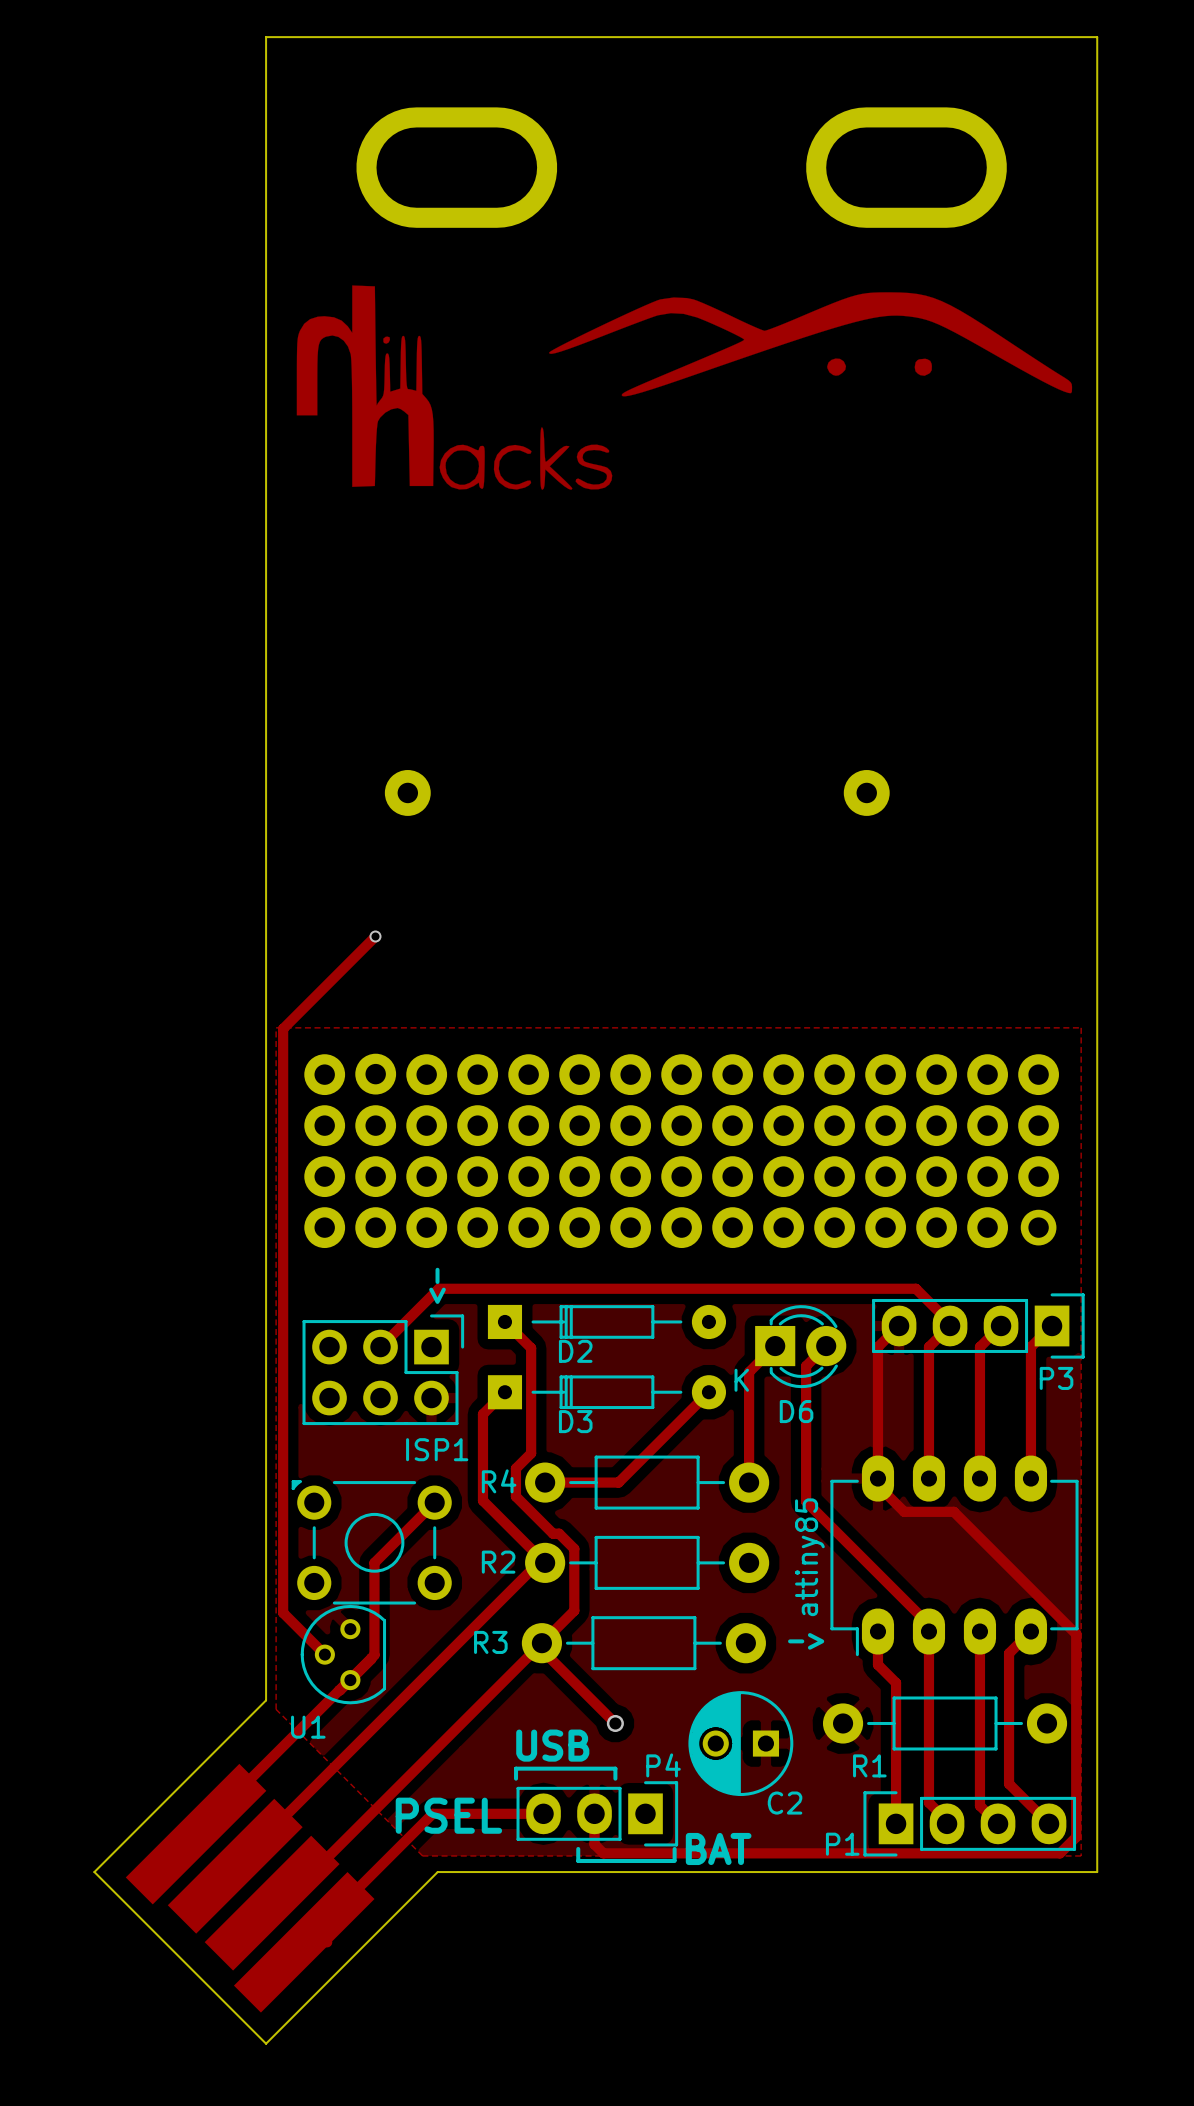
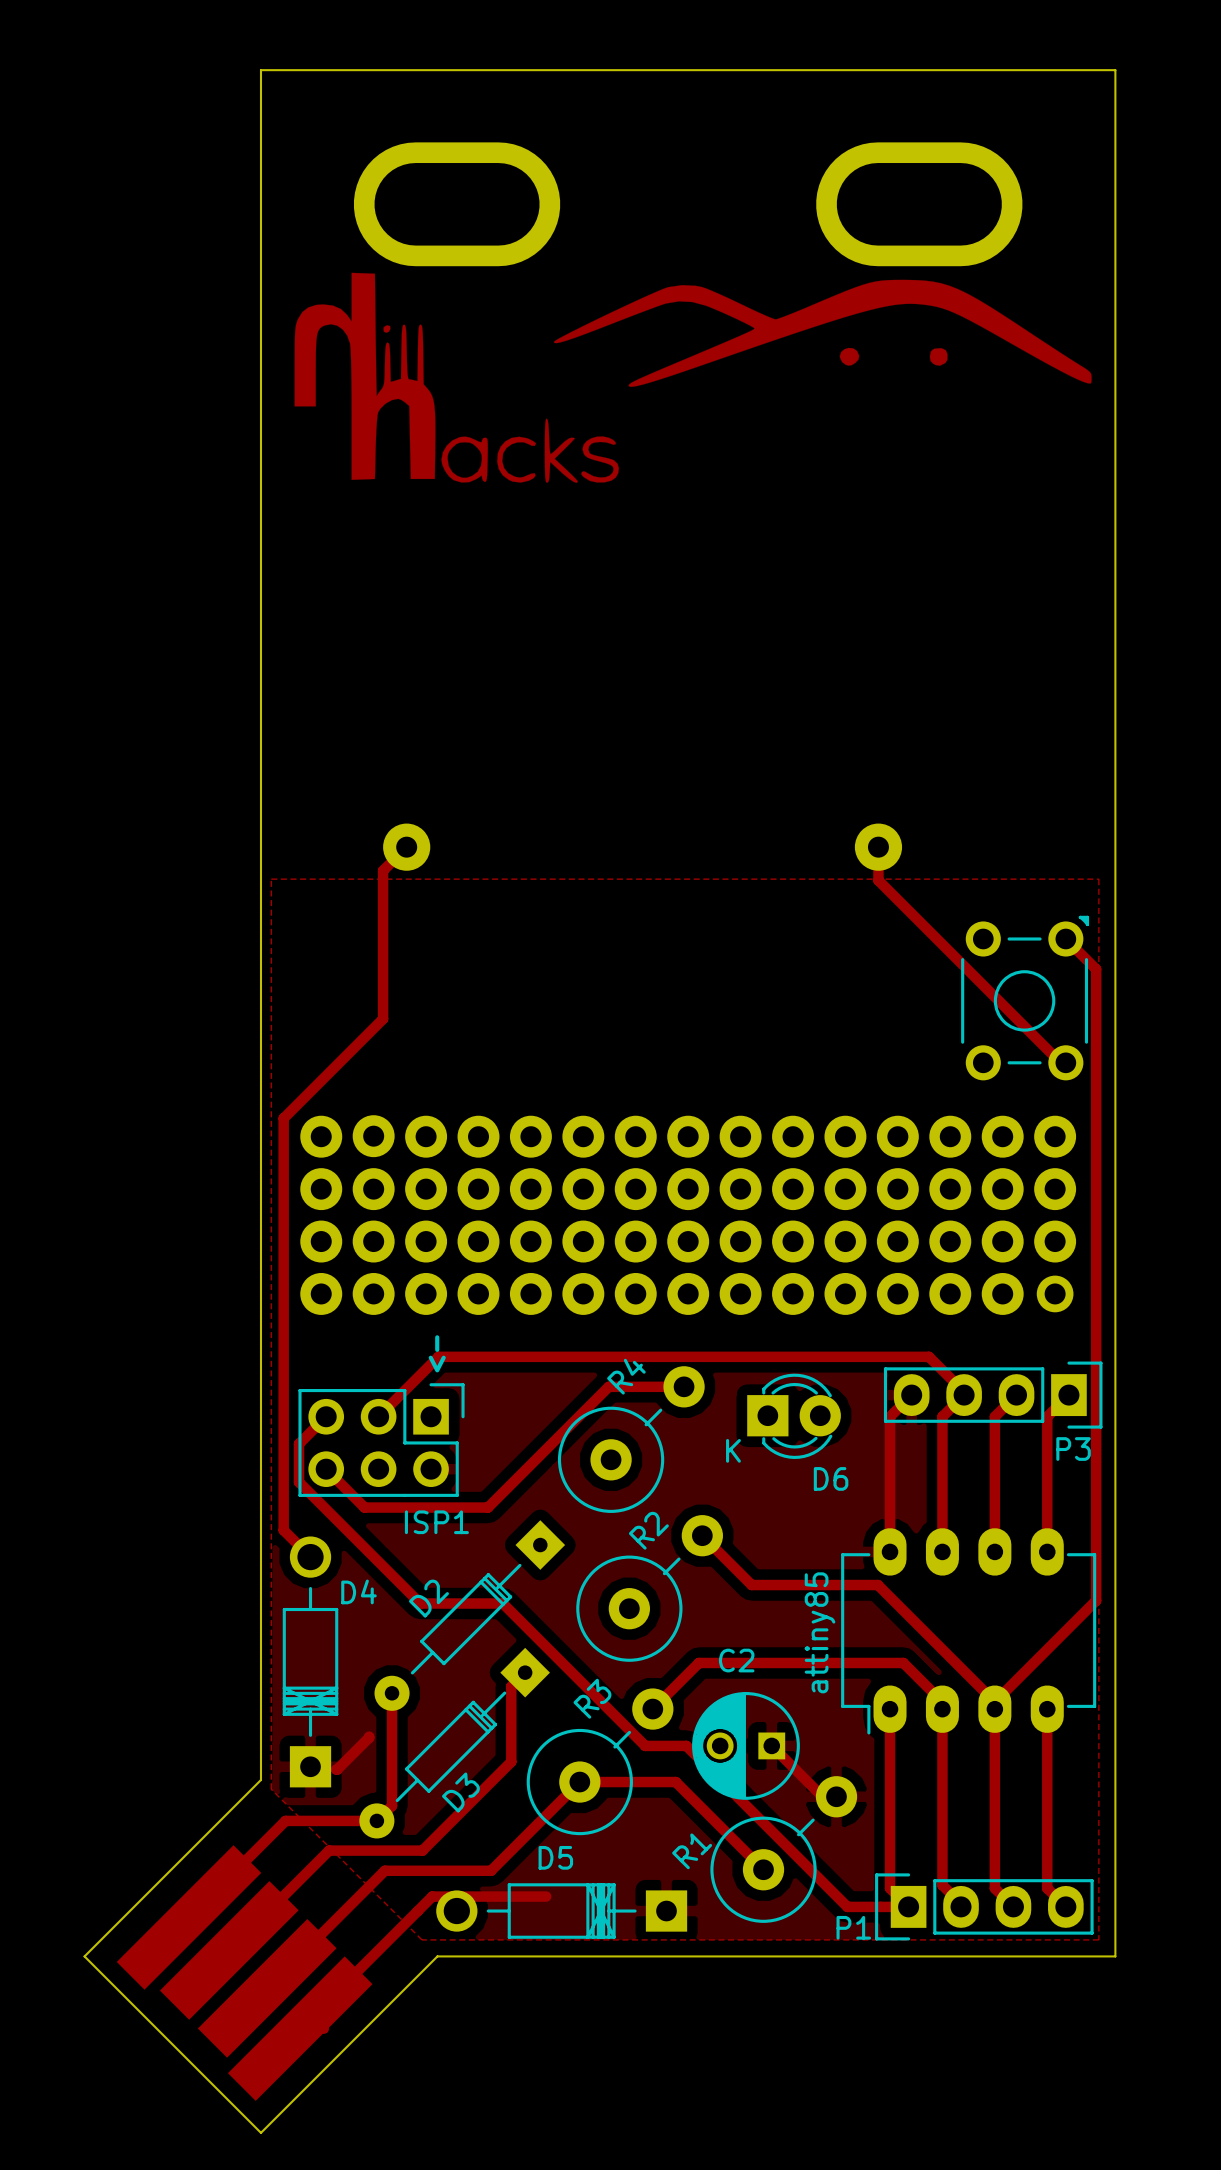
drawing position: (684, 387) -> (693, 377)
track: none -> (406, 847) (383, 870) (383, 1018) (283, 1118) (283, 1530) (310, 1557)
track: none -> (878, 847) (878, 880) (1060, 1062) (1065, 1062)
track: none -> (1065, 938) (1096, 969) (1096, 1600) (994, 1701) (877, 1585) (751, 1585) (702, 1535)
track: (375, 936) (283, 1028) (283, 1612) (324, 1654) -> none
via: (375, 936) -> none
part: none -> (1025, 998)
zone outline: (276, 1027) (1081, 1027) -> (271, 1088) (271, 879) (1098, 879) (1098, 1088)
track: none -> (684, 1386) (608, 1386) (488, 1507) (364, 1507) (326, 1469)
track: (504, 1321) (531, 1348) (531, 1453) (515, 1468) (515, 1496) (553, 1533) (559, 1533) (574, 1548) (574, 1610) (281, 1903) (272, 1903) -> (763, 1869) (675, 1782) (579, 1782) (491, 1870) (384, 1870) (267, 1988)
D2 rotation: 0° (606, 1321) -> 135° clockwise (469, 1615)
D2 position: (606, 1321) -> (469, 1615)
track: (775, 1346) (749, 1372) (749, 1482) -> none
D6 position: (800, 1346) -> (794, 1416)
track: (826, 1346) (806, 1366) (806, 1501) (891, 1586) -> (652, 1709) (698, 1662) (903, 1662)
D2 name position: D2 (575, 1351) -> D2 (428, 1598)
D3 footprint: [487, 1375, 727, 1410] -> [359, 1647, 550, 1839]
track: (504, 1392) (482, 1414) (482, 1500) (545, 1562) (538, 1562) (332, 1769) -> (525, 1672) (511, 1686) (511, 1761) (422, 1850) (329, 1850)
track: (708, 1392) (618, 1482) (545, 1482) -> none
D6 name position: D6 (796, 1411) -> D6 (831, 1478)
D3 name position: D3 (575, 1421) -> D3 (460, 1792)
R4 footprint: [525, 1455, 770, 1510] -> [557, 1366, 705, 1513]
track: (877, 1478) (877, 1485) (904, 1511) (953, 1511) (1076, 1634) (1076, 1837) (1059, 1853) (603, 1853) (594, 1844) (594, 1813) -> none
R4 name position: R4 (499, 1481) -> R4 (626, 1376)
track: (434, 1502) (374, 1562) (374, 1655) (196, 1834) -> (392, 1693) (392, 1805) (376, 1820) (285, 1820) (189, 1917)
R2 footprint: [525, 1535, 770, 1590] -> [576, 1515, 723, 1662]
part: (371, 1542) -> none
R2 name position: R2 (498, 1562) -> R2 (648, 1530)
D4: none -> (310, 1661)
R3 footprint: [521, 1616, 766, 1671] -> [526, 1688, 674, 1836]
track: (1030, 1631) (1009, 1653) (1009, 1783) (1030, 1805) -> (1047, 1709) (1047, 1888)
text: <- (806, 1641) -> none
R3 name position: R3 (490, 1642) -> R3 (592, 1698)
track: (541, 1643) (541, 1650) (615, 1723) -> none
U1: (343, 1654) -> none
track: (877, 1664) (896, 1682) (896, 1823) -> (890, 1743) (890, 1888) (908, 1906) (847, 1906) (686, 1745) (645, 1745) (502, 1603) (420, 1603) (299, 1482) (299, 1443) (326, 1416)
track: none -> (771, 1745) (822, 1796) (836, 1796)
R1 footprint: [822, 1696, 1068, 1751] -> [710, 1776, 858, 1923]
via: (615, 1723) -> none
C2 position: (740, 1743) -> (745, 1745)
text: USB (552, 1745) -> none
R1 name position: R1 (869, 1765) -> R1 (692, 1851)
line: (516, 1778) (516, 1768) (615, 1768) (615, 1778) -> none
C2 name position: C2 (785, 1803) -> C2 (736, 1660)
P4: (597, 1813) -> none
text: PSEL (448, 1815) -> none
D5: none -> (561, 1911)
line: (578, 1848) (578, 1861) (674, 1861) -> none
line: (674, 1848) (674, 1860) -> none
text: BAT (718, 1848) -> none

